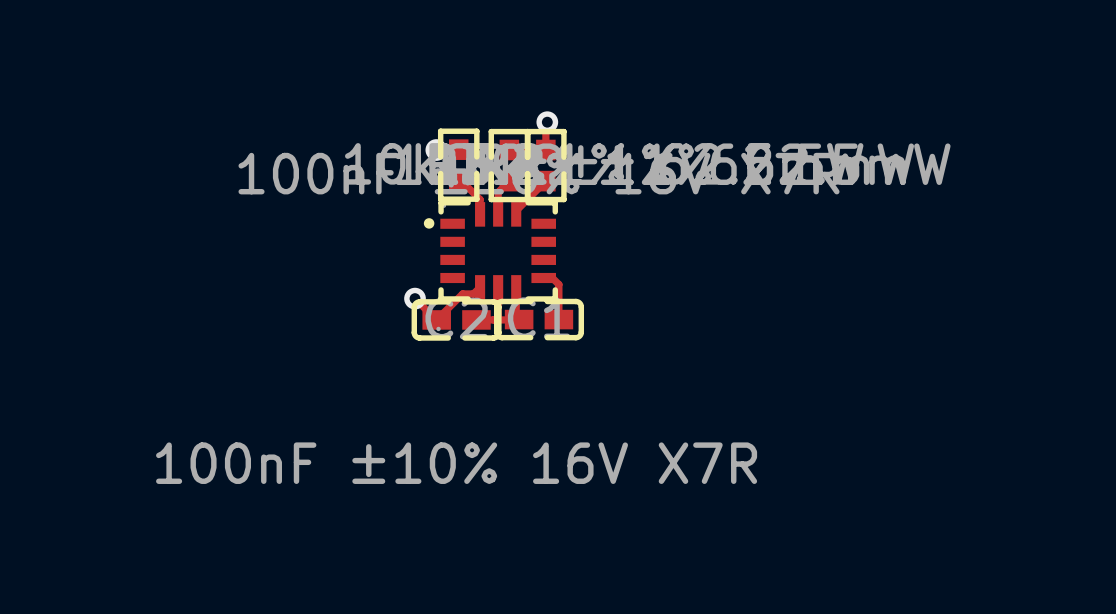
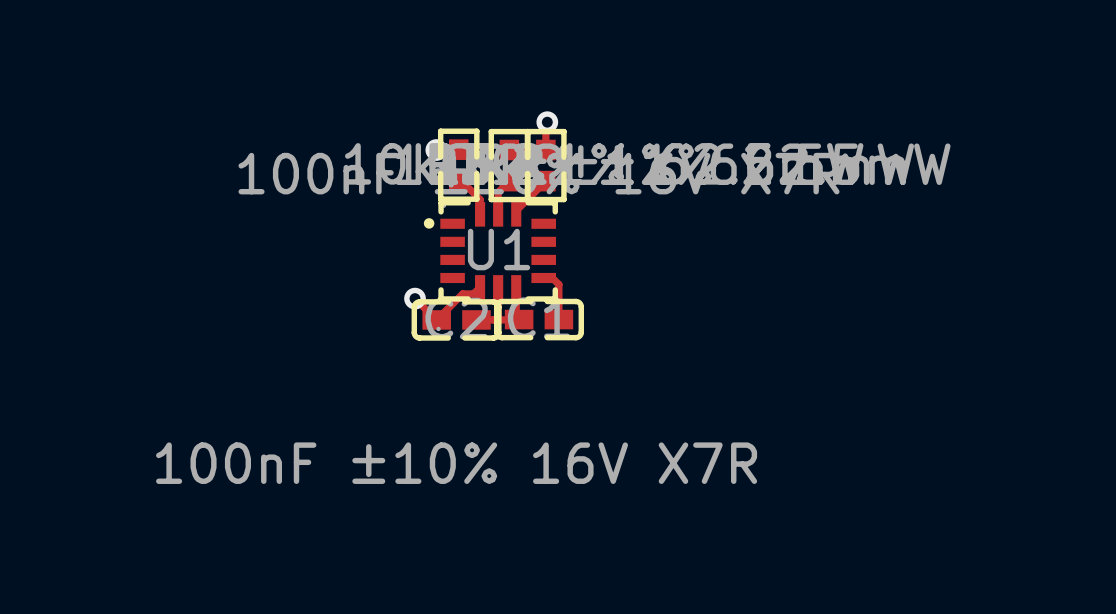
U1 name: none -> U1 (499, 249)

